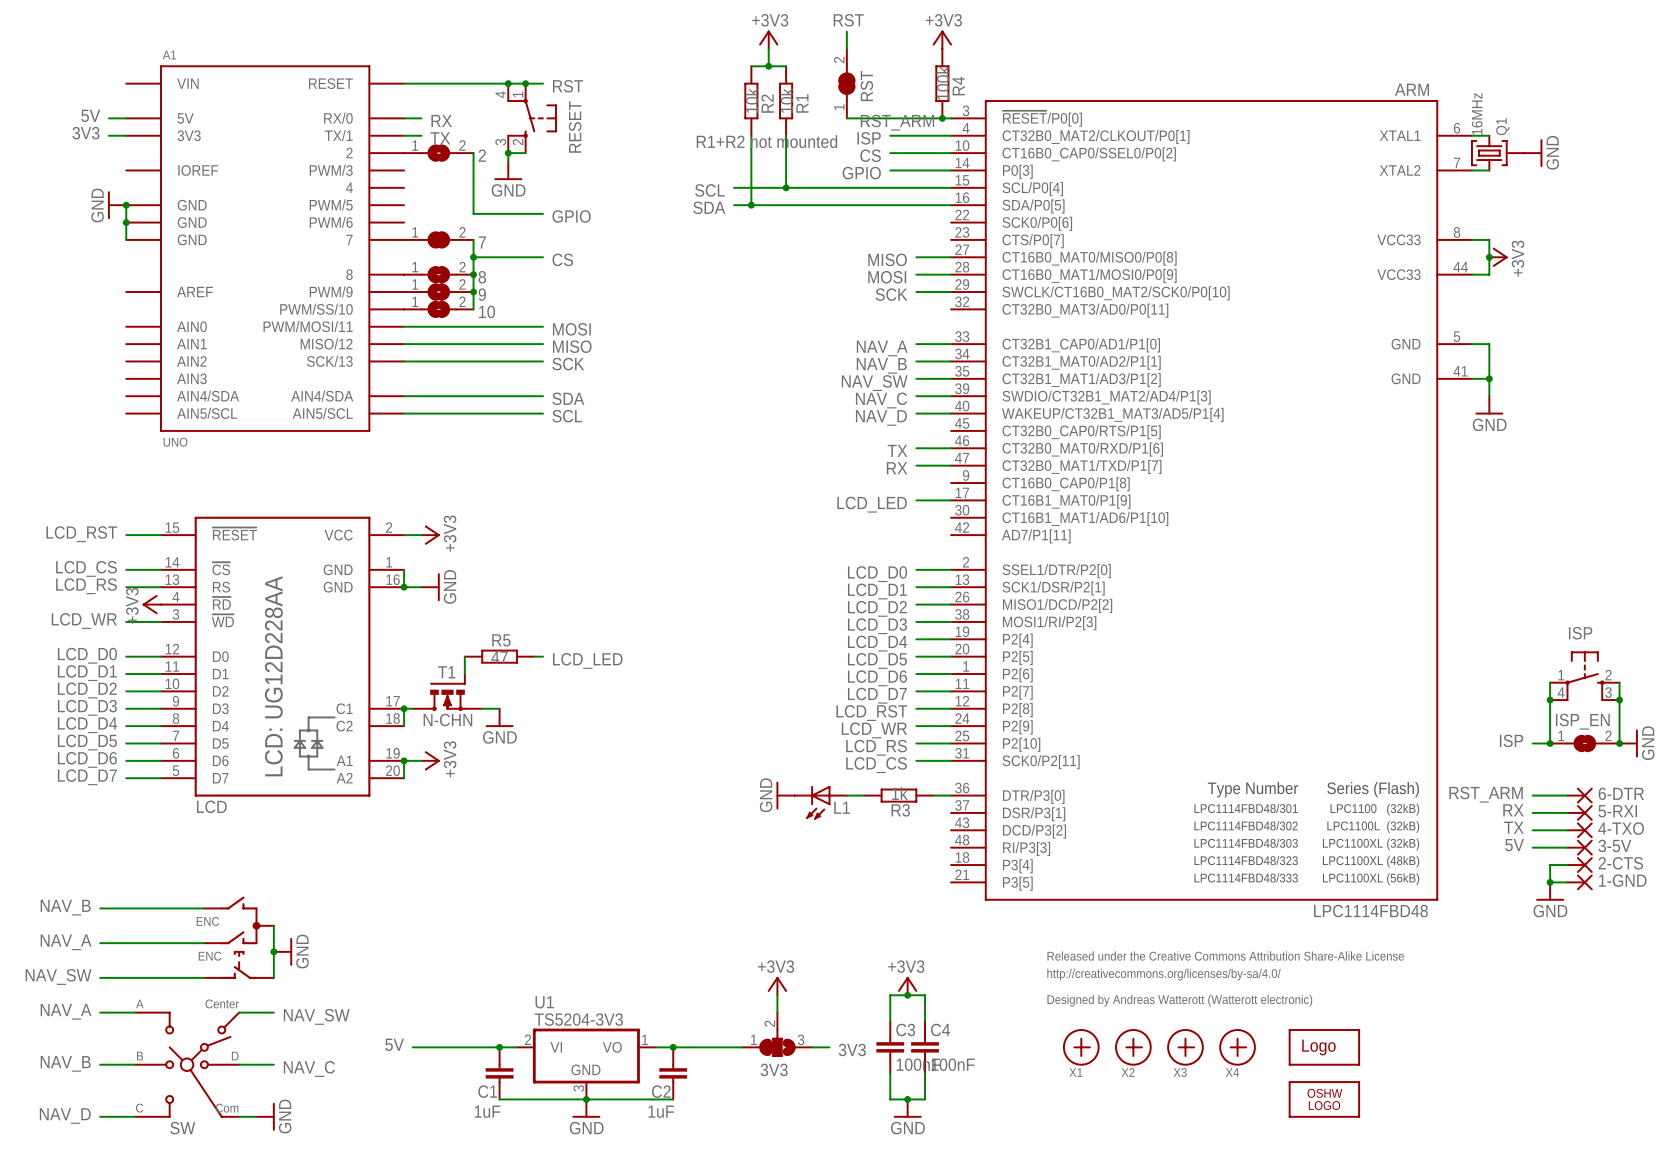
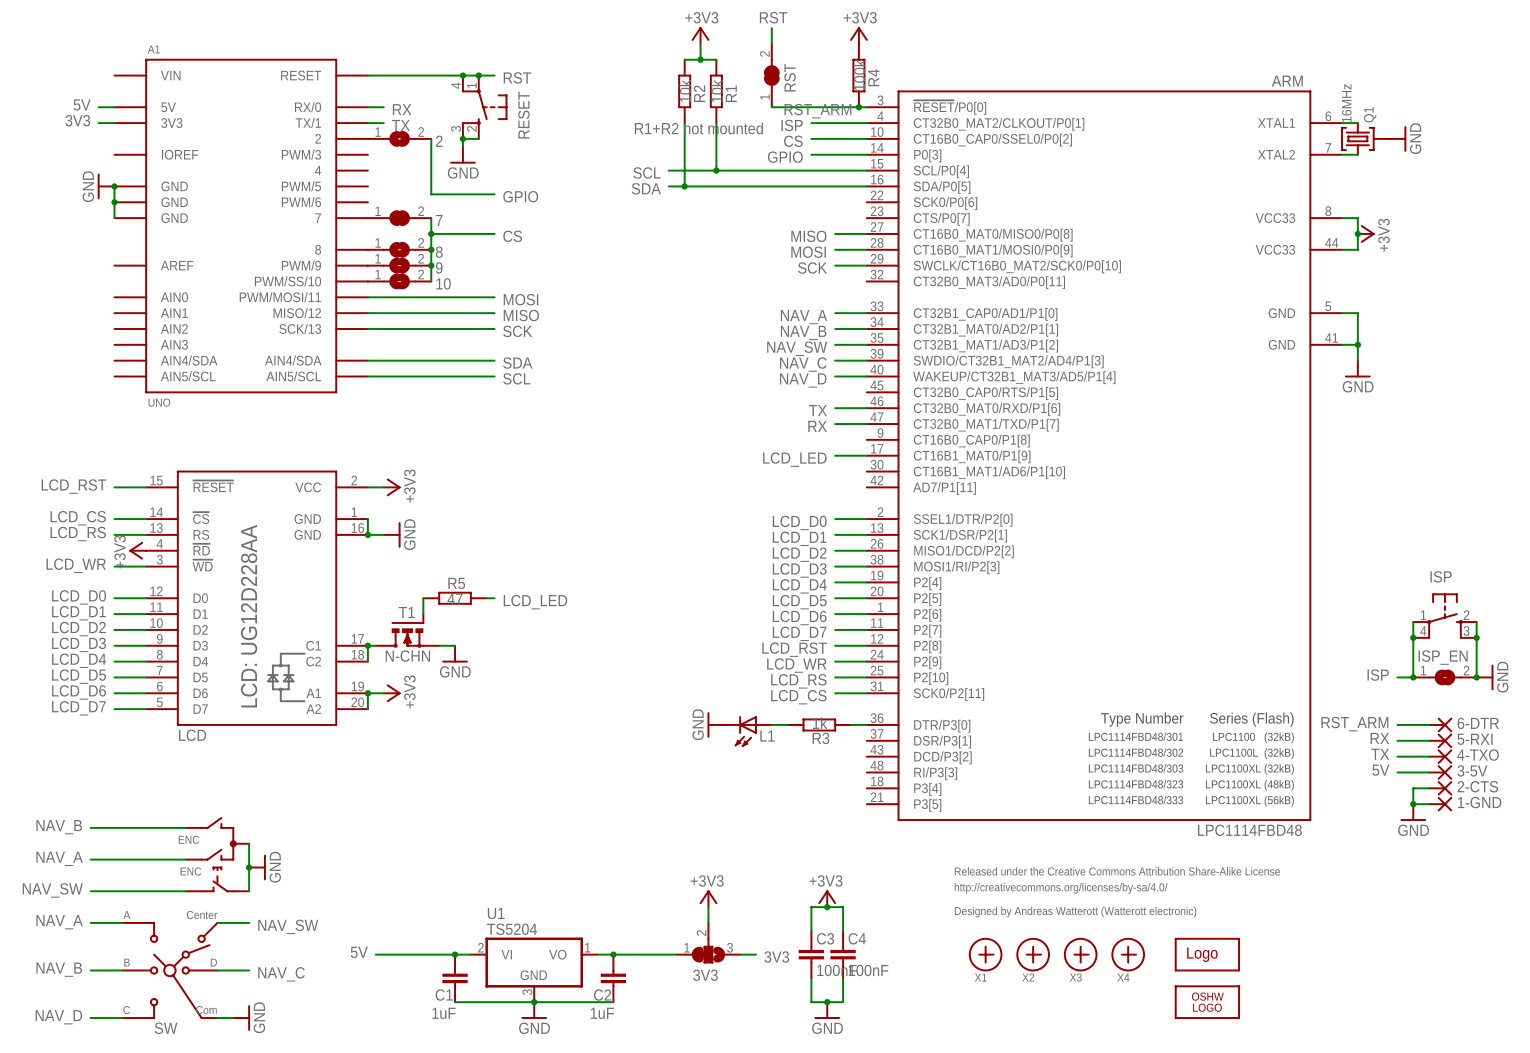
U1 value: TS5204-3V3 (578, 1019) -> TS5204 (512, 929)

